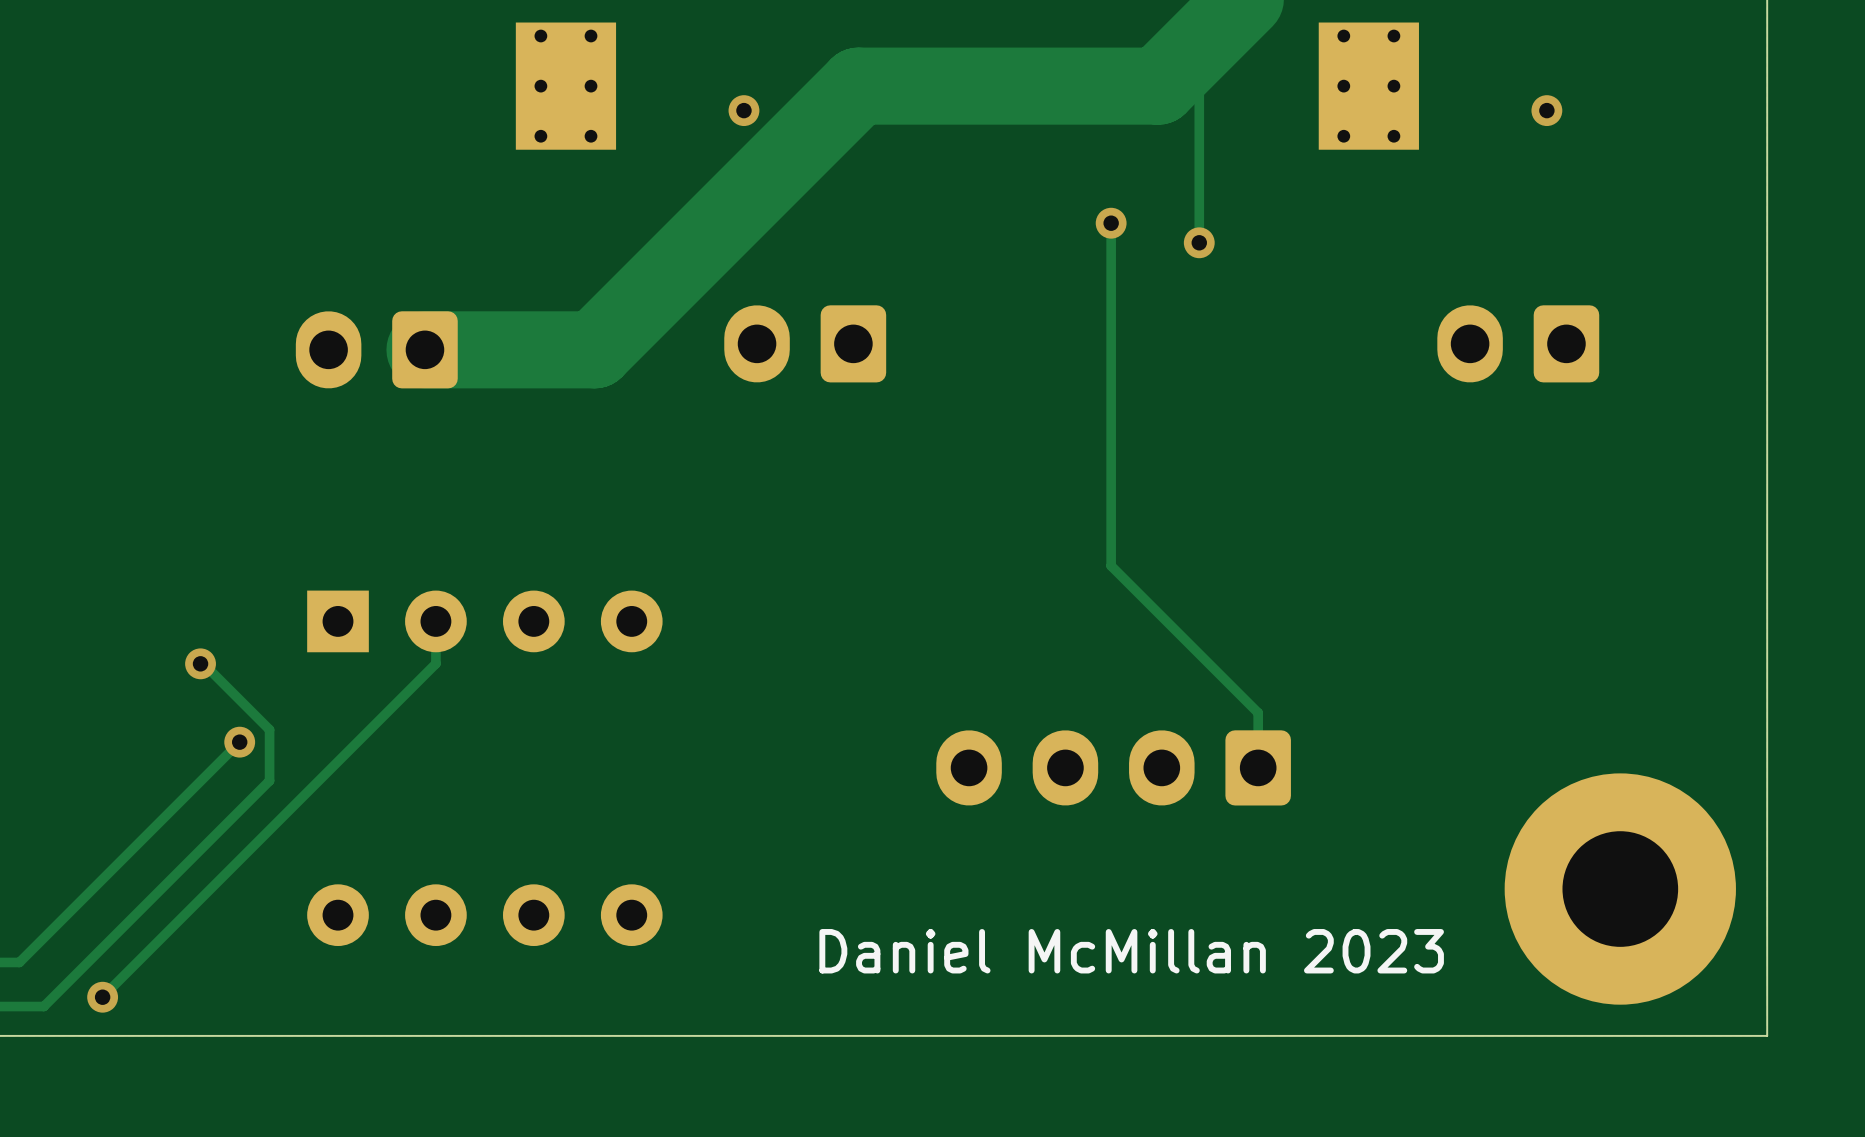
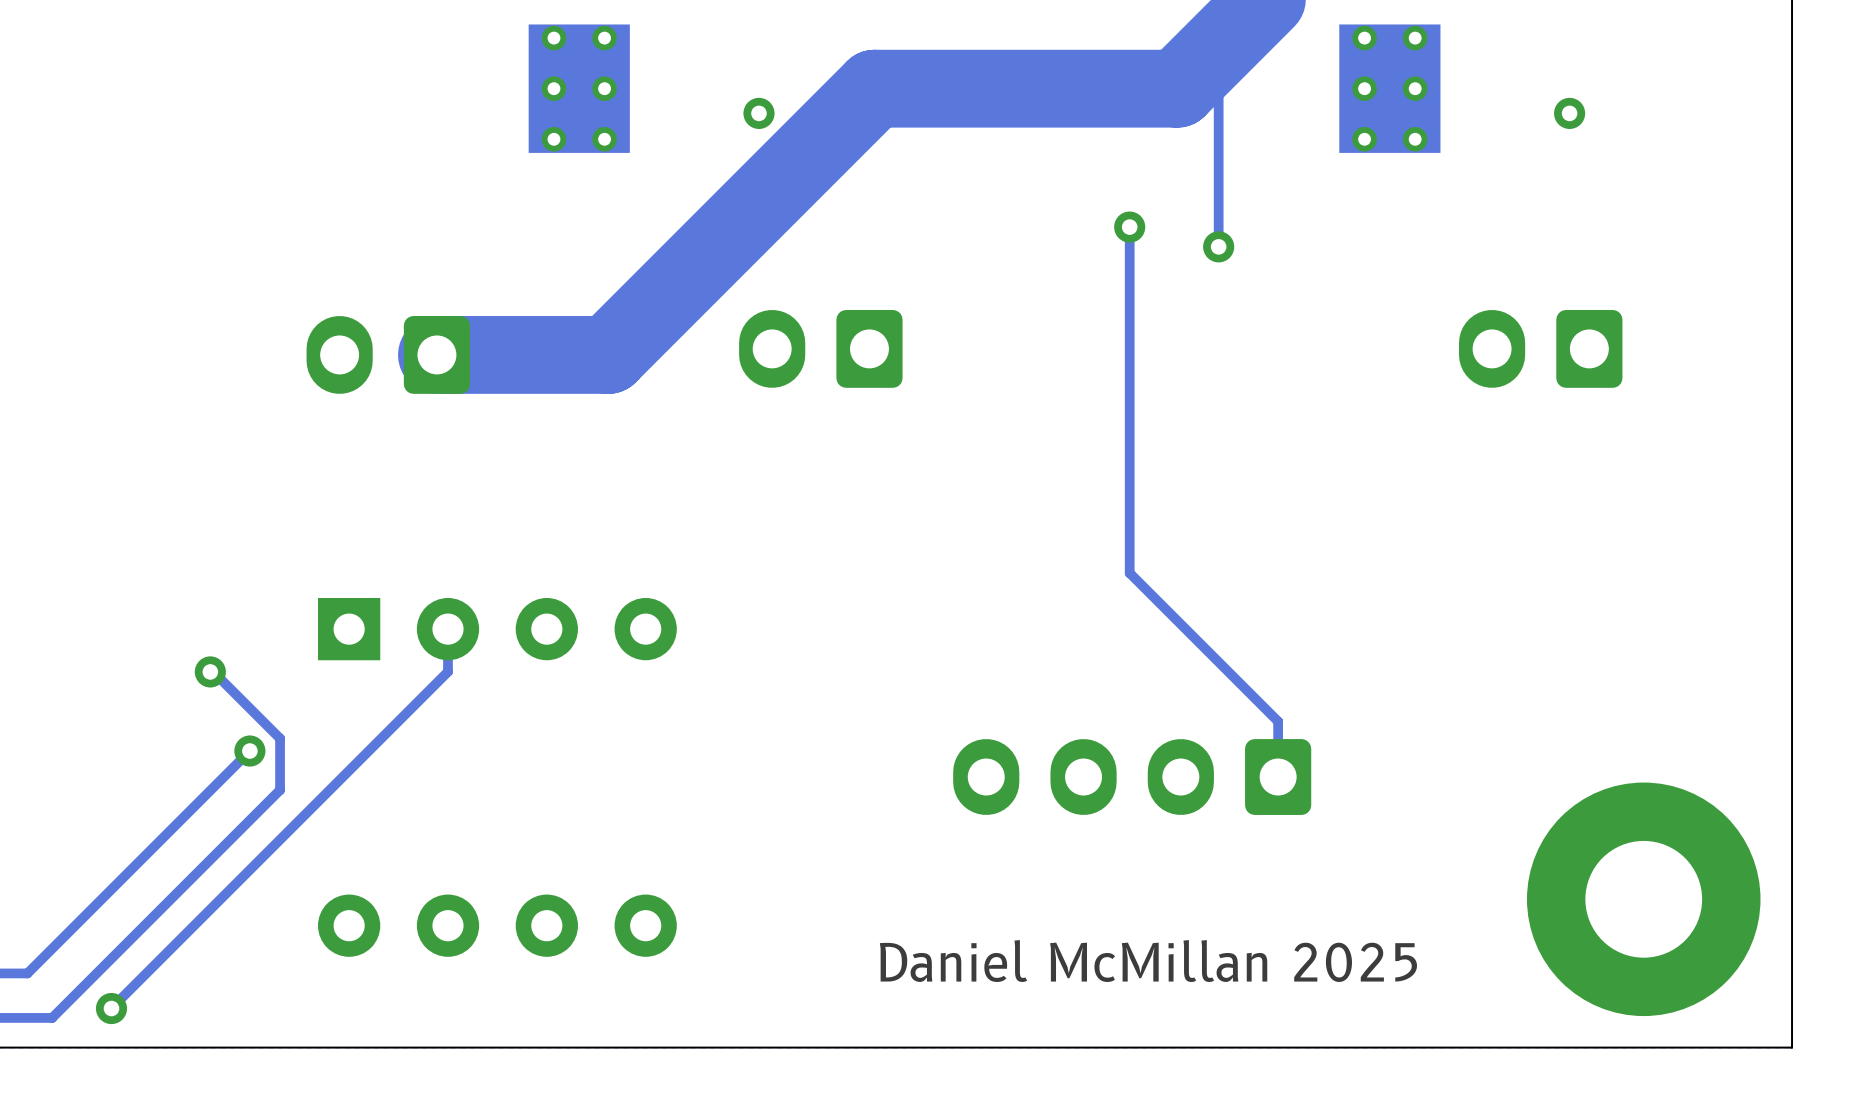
text: Daniel McMillan 2023 (1131, 951) -> Daniel McMillan 2025 (1148, 961)

